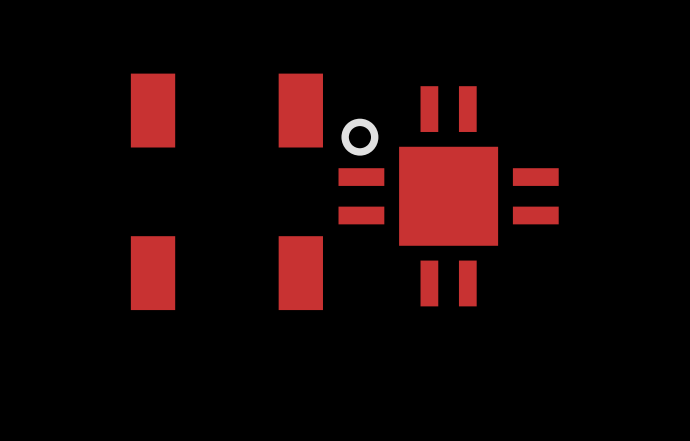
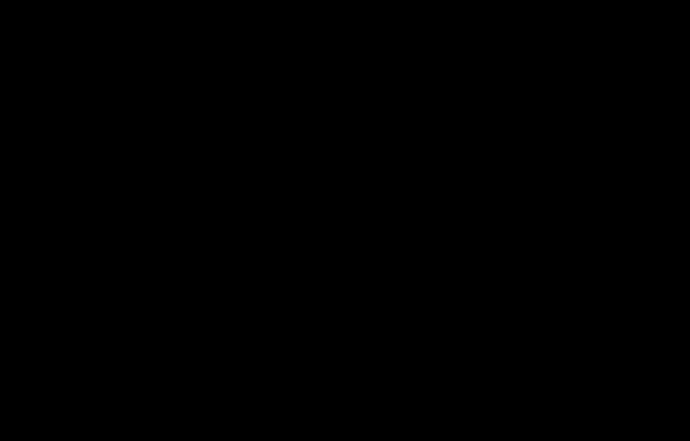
part: (226, 191) -> none
part: (448, 196) -> none

